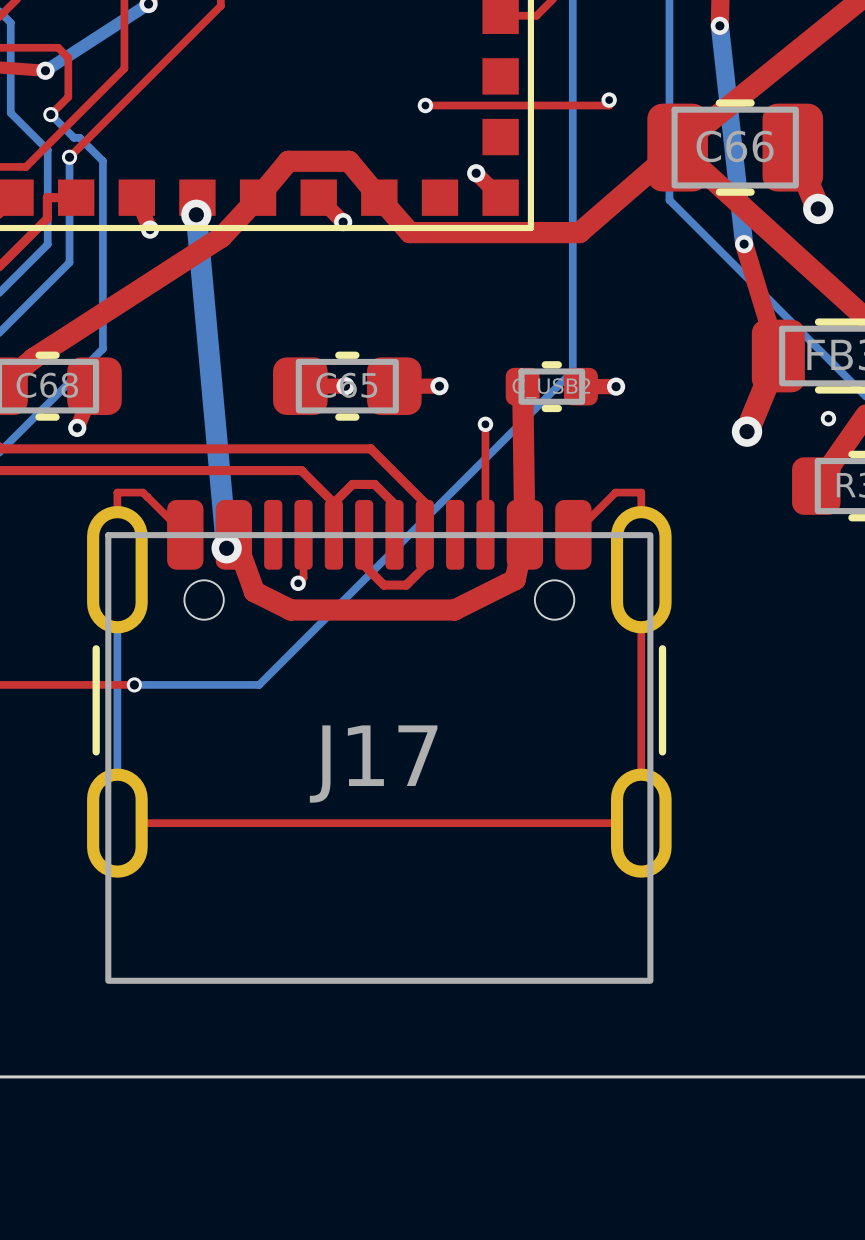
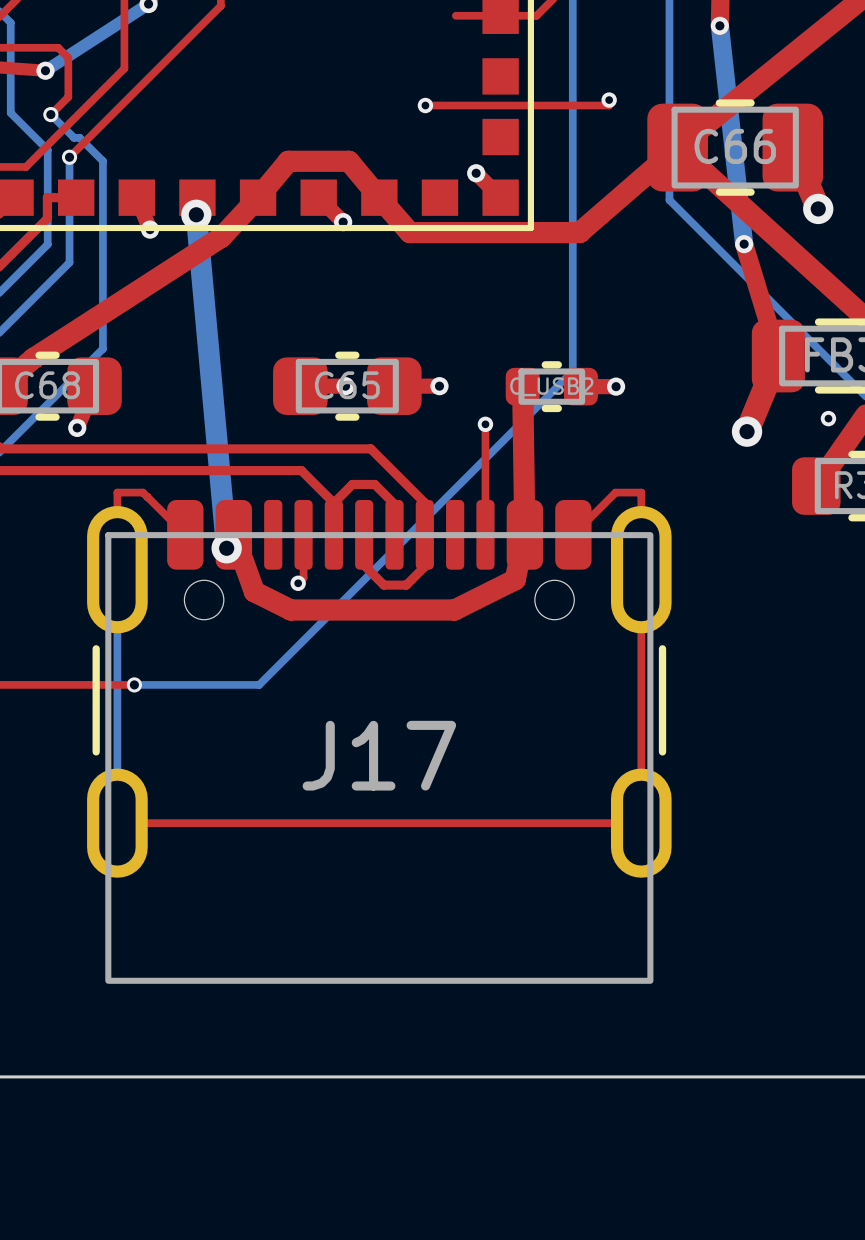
top track: none -> (455, 15) (500, 15)

